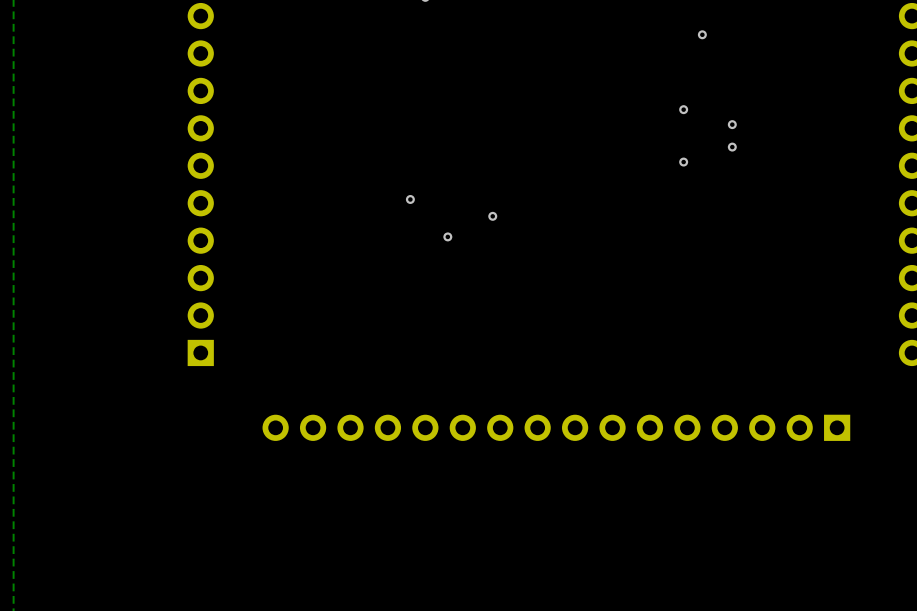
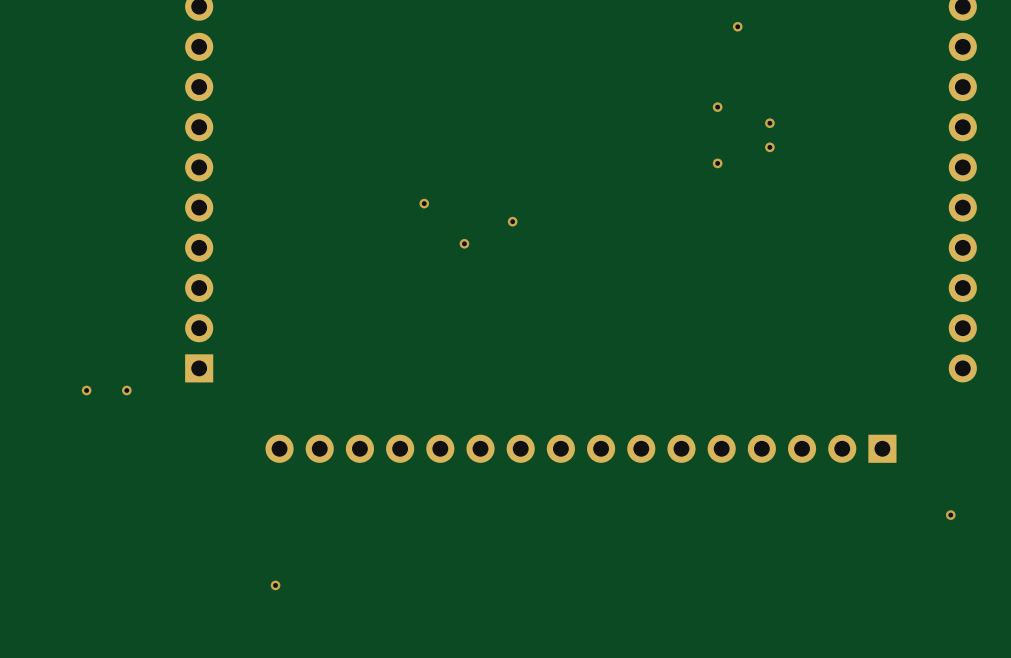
via: none -> (86, 390)
via: none -> (126, 390)
via: none -> (950, 515)
via: none -> (275, 585)

